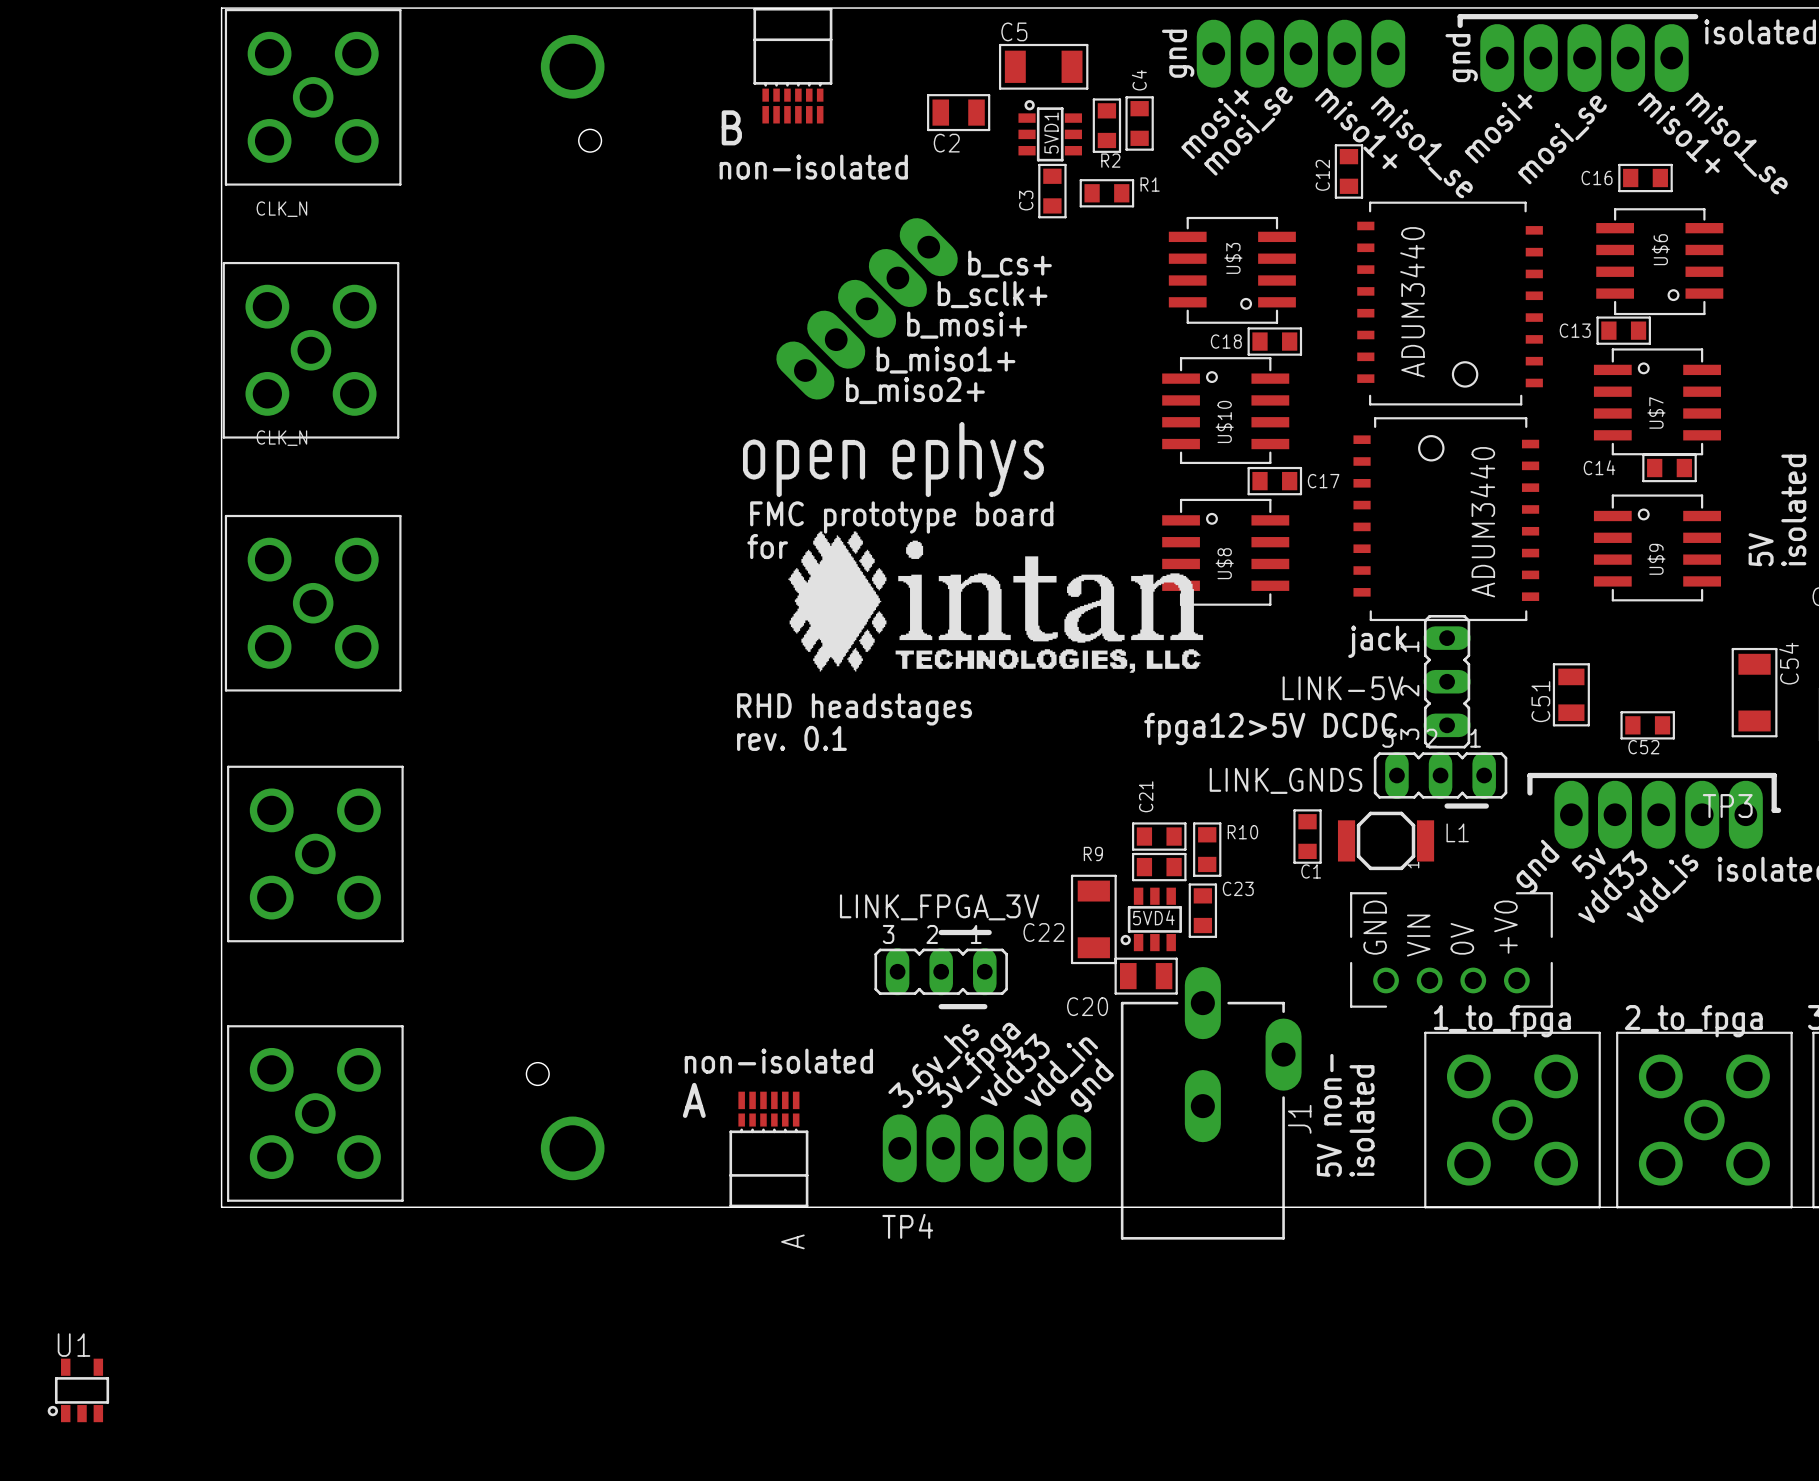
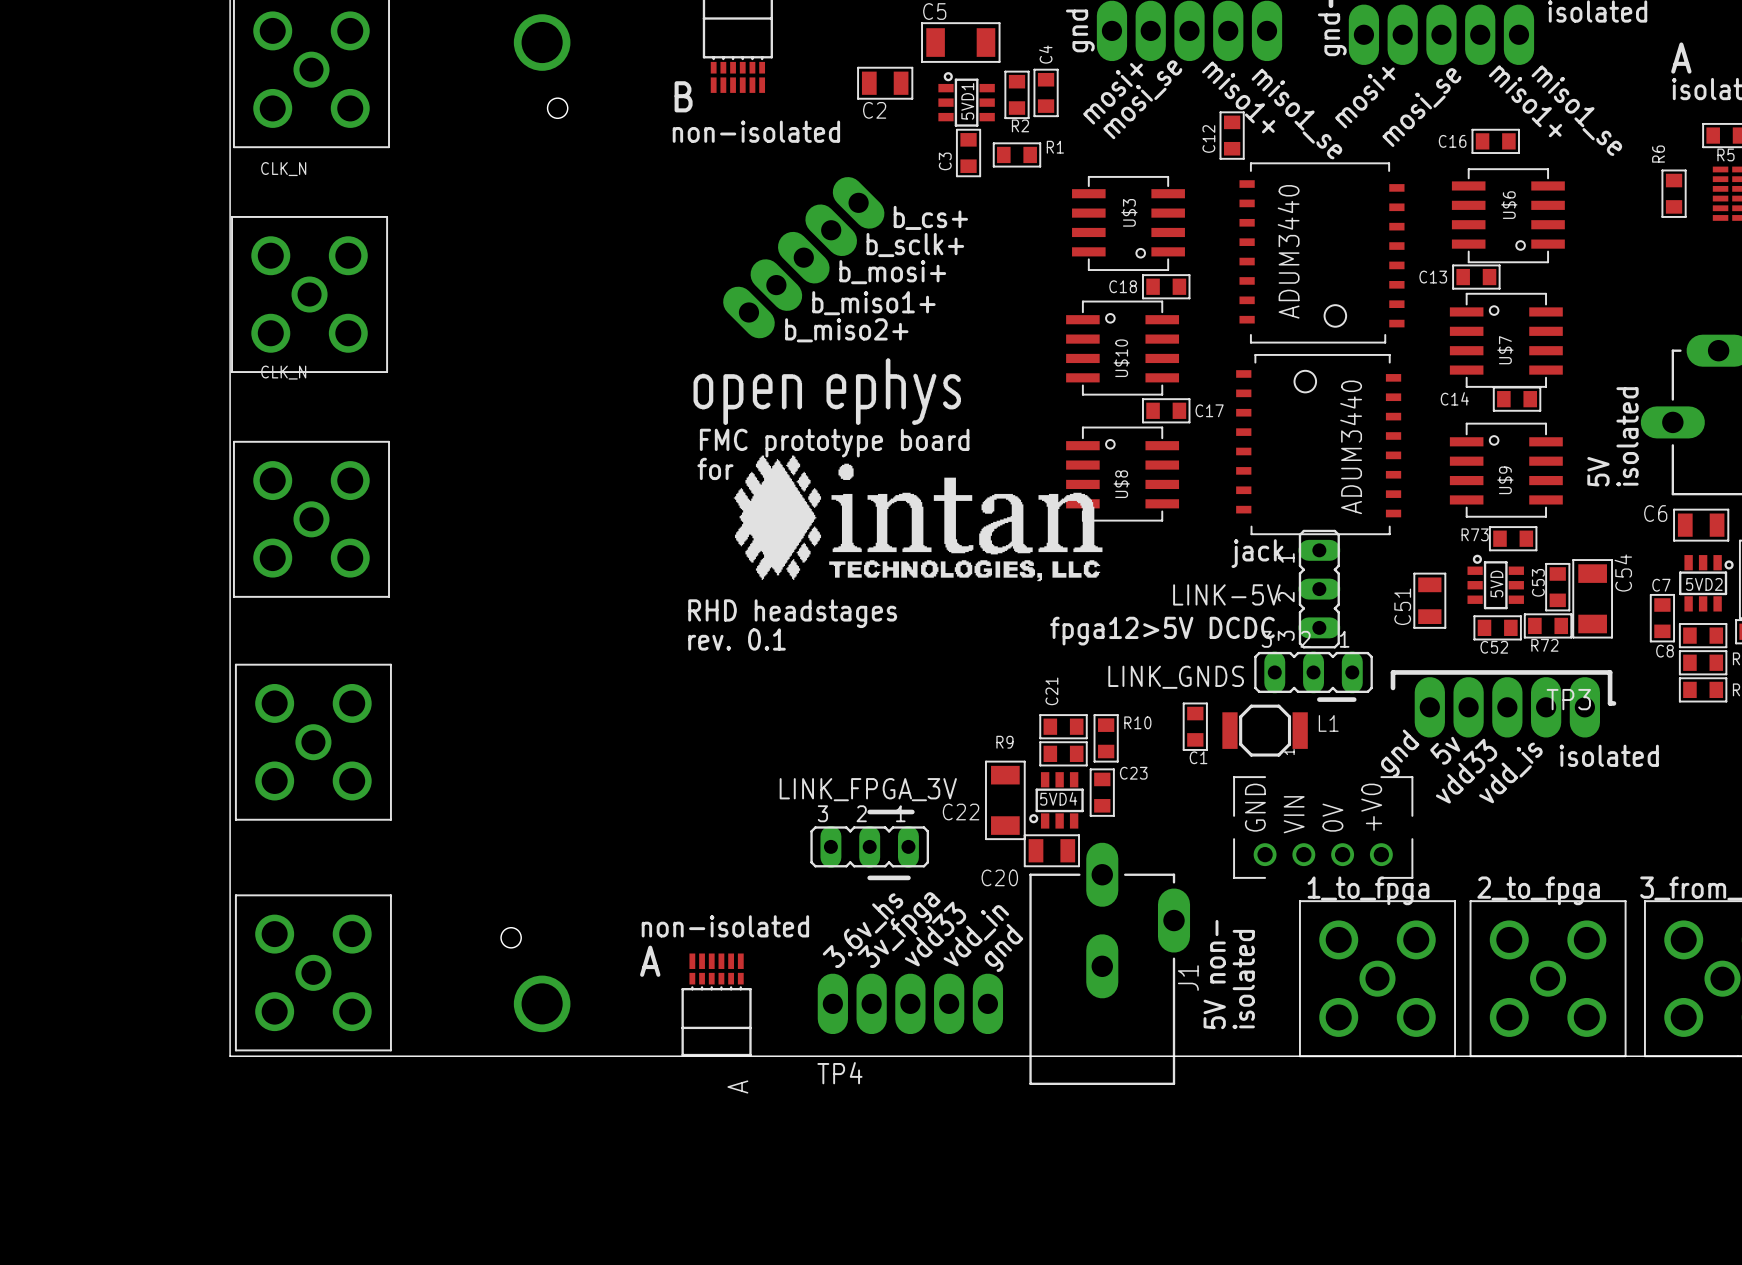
R73: none -> (1513, 538)
5VD: none -> (1495, 581)
C53: none -> (1557, 587)
R72: none -> (1548, 625)
U1: (78, 1390) -> none

